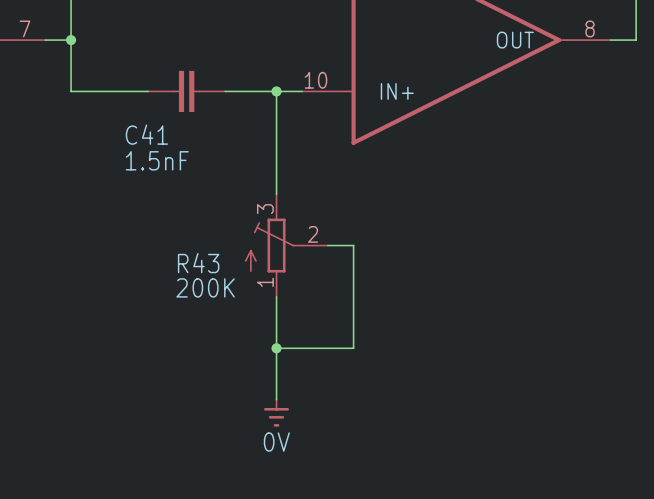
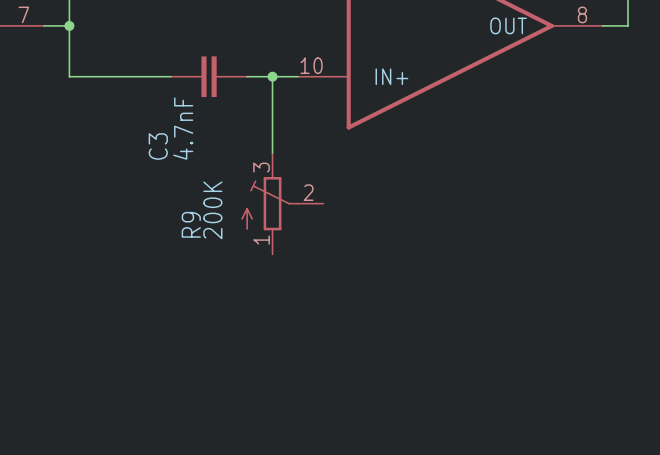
C41: 1.5nF (186, 91) -> none
C3: none -> 4.7nF (209, 76)
R9: none -> 200K (282, 203)
R43: 200K (286, 245) -> none
wire: (327, 245) (353, 245) (353, 348) (276, 348) -> none
wire: (276, 296) (276, 399) -> none
junction: (276, 348) -> none
power symbol: 0V (276, 412) -> none

